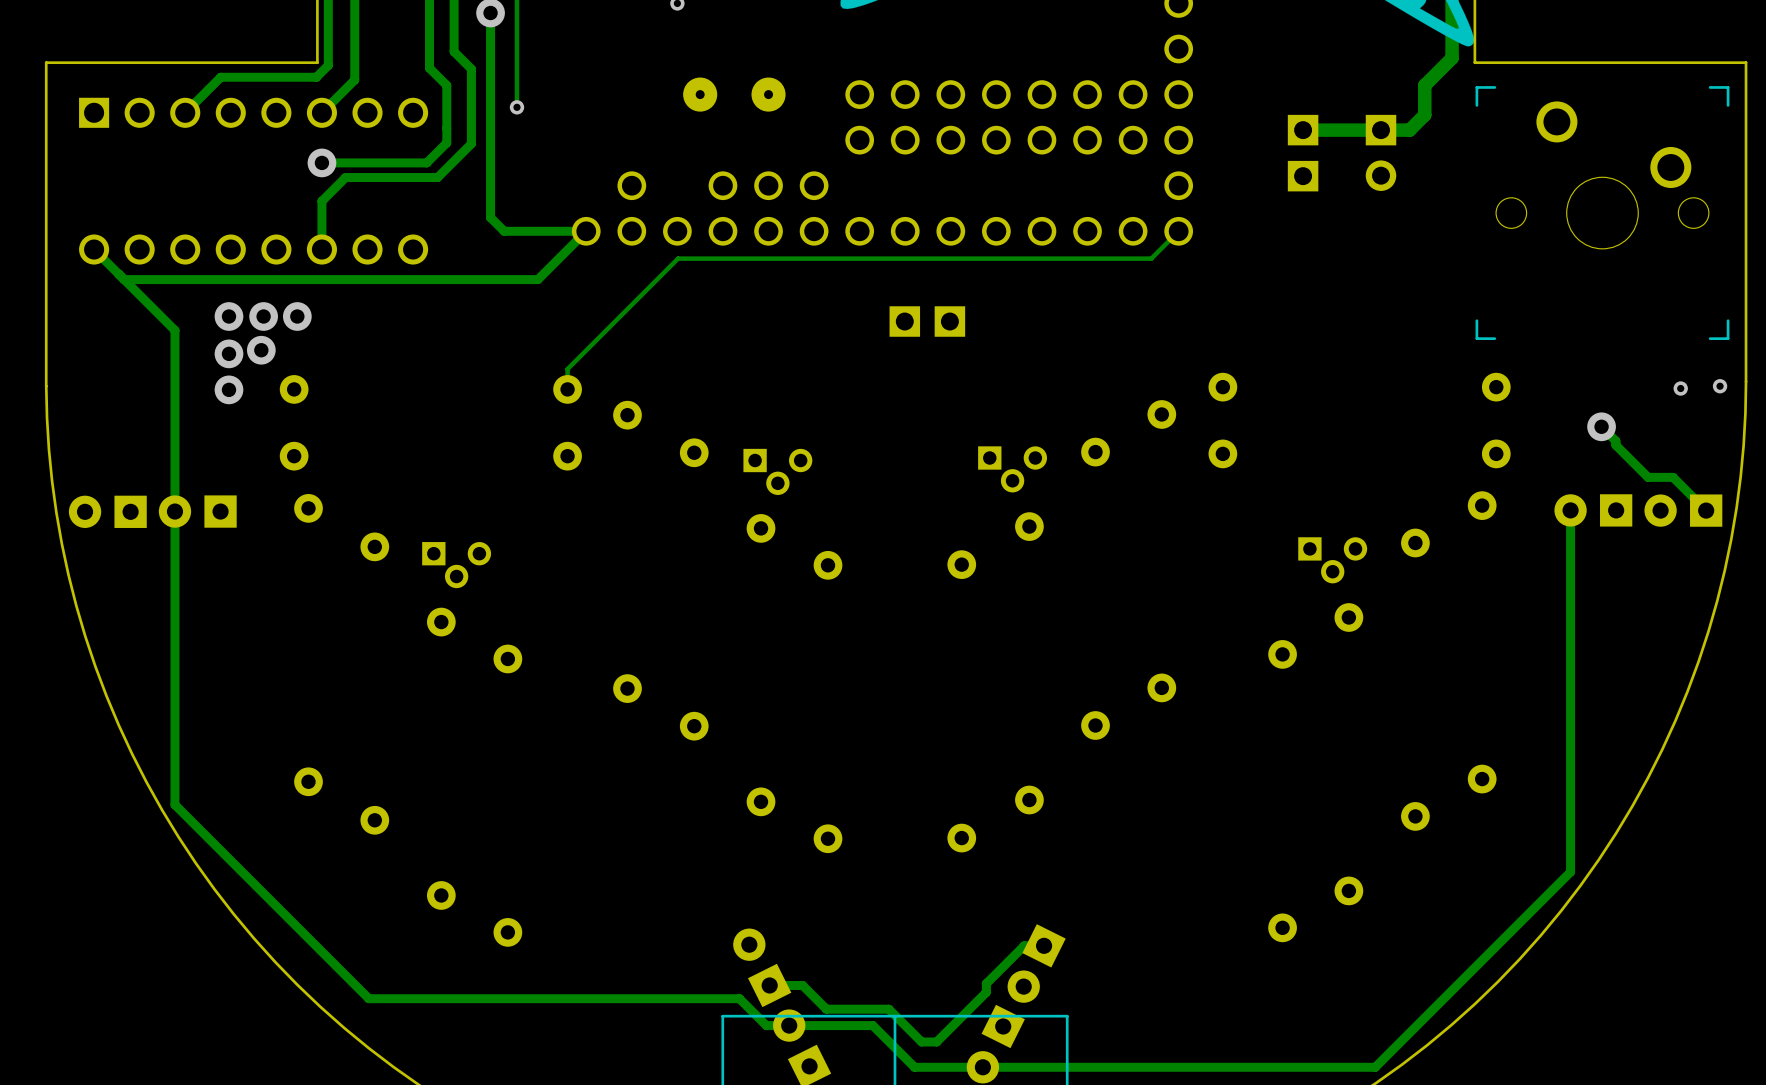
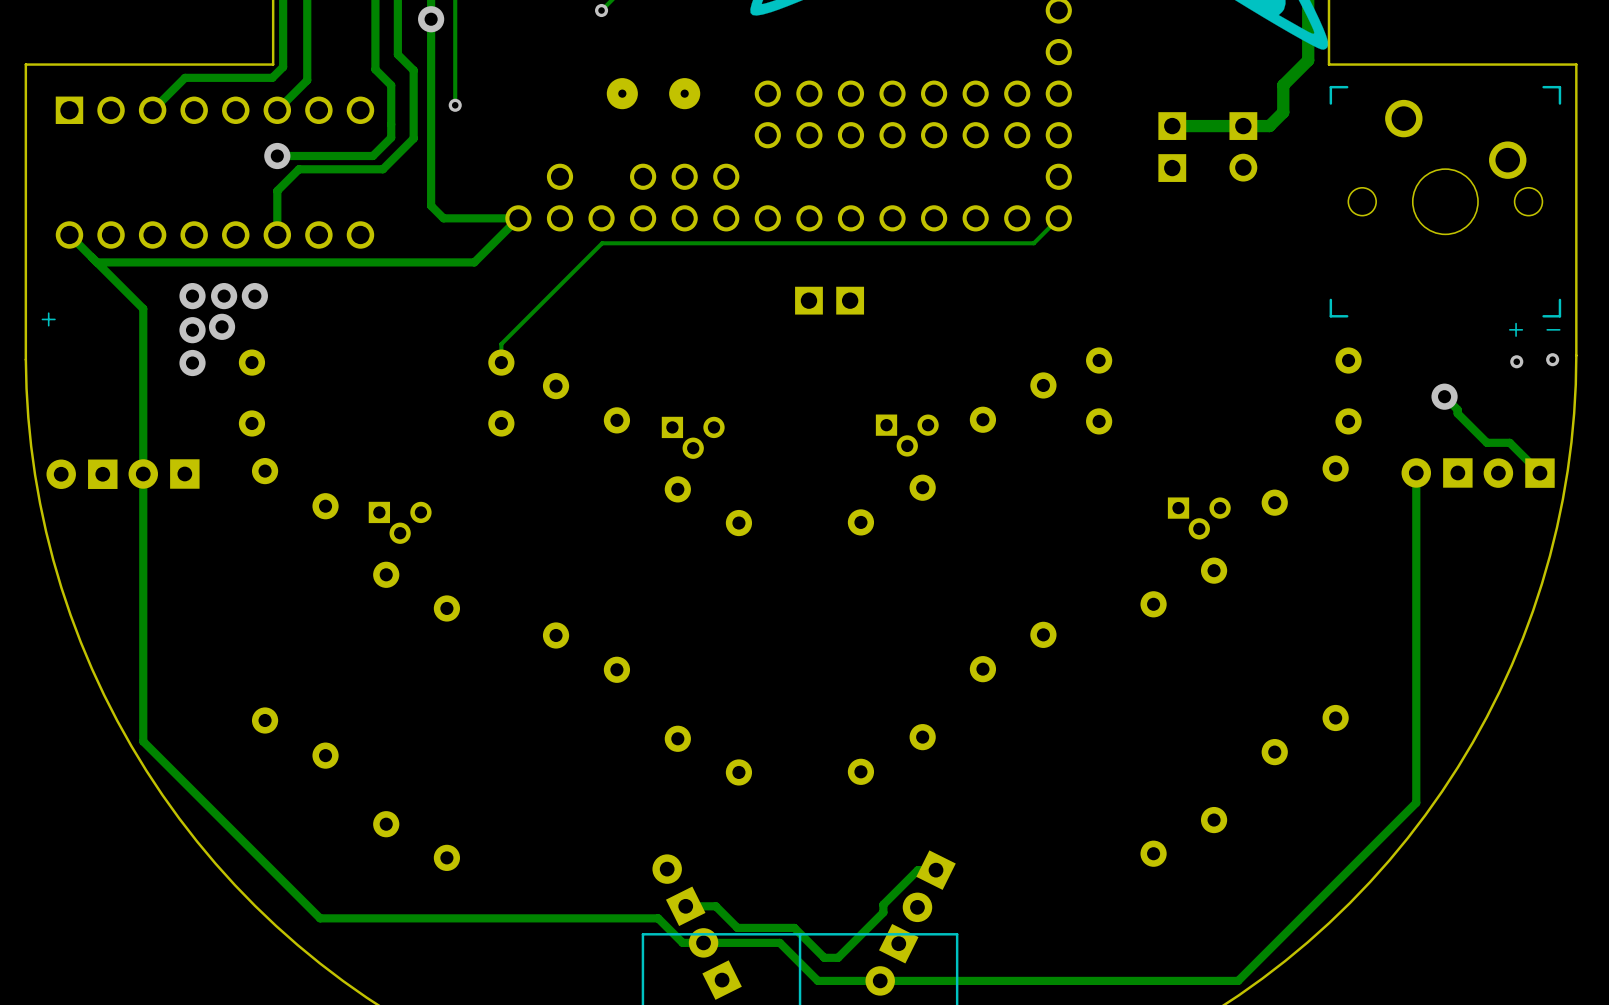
text: none -> + (48, 319)
text: none -> + (1516, 329)
text: none -> - (1553, 329)

